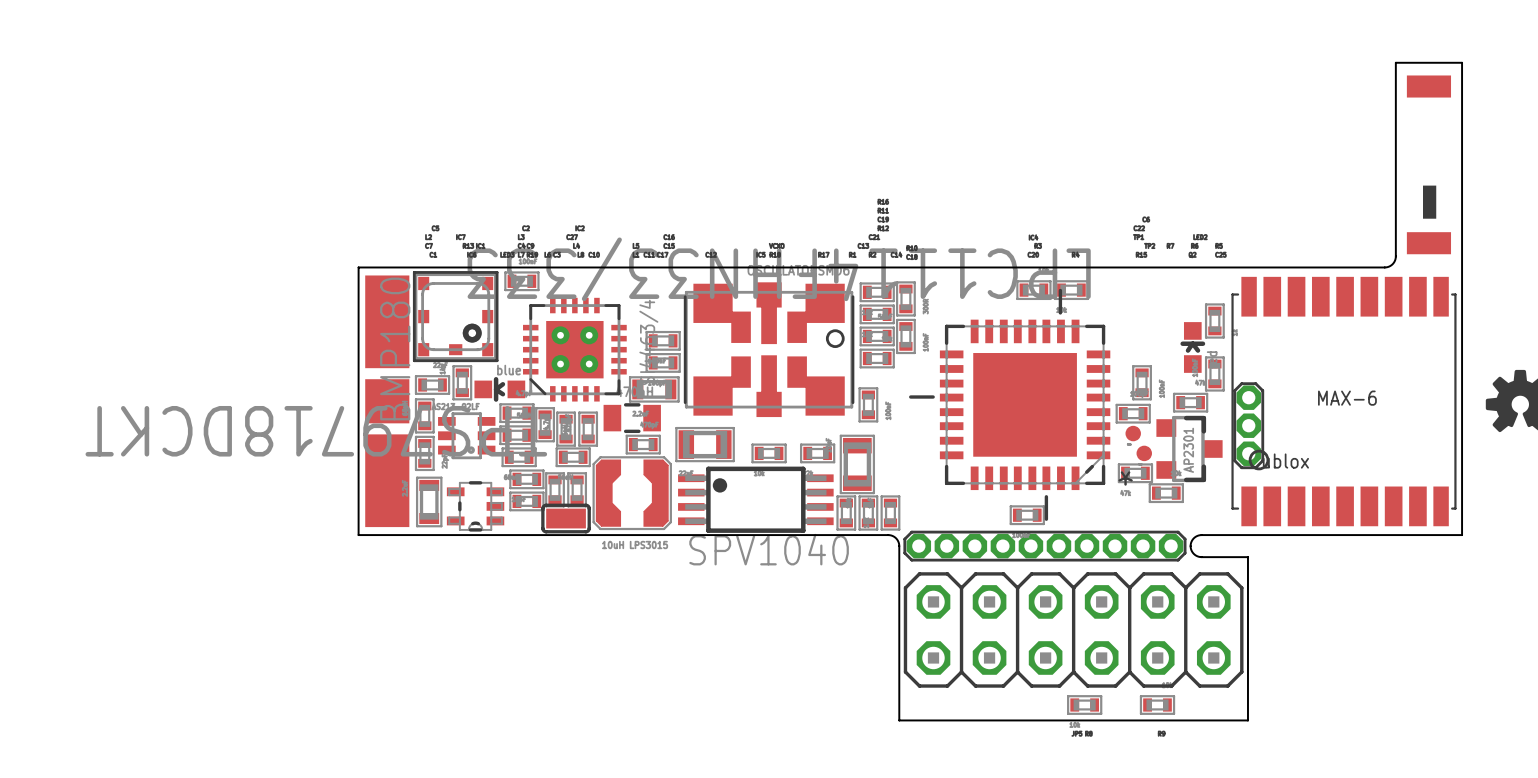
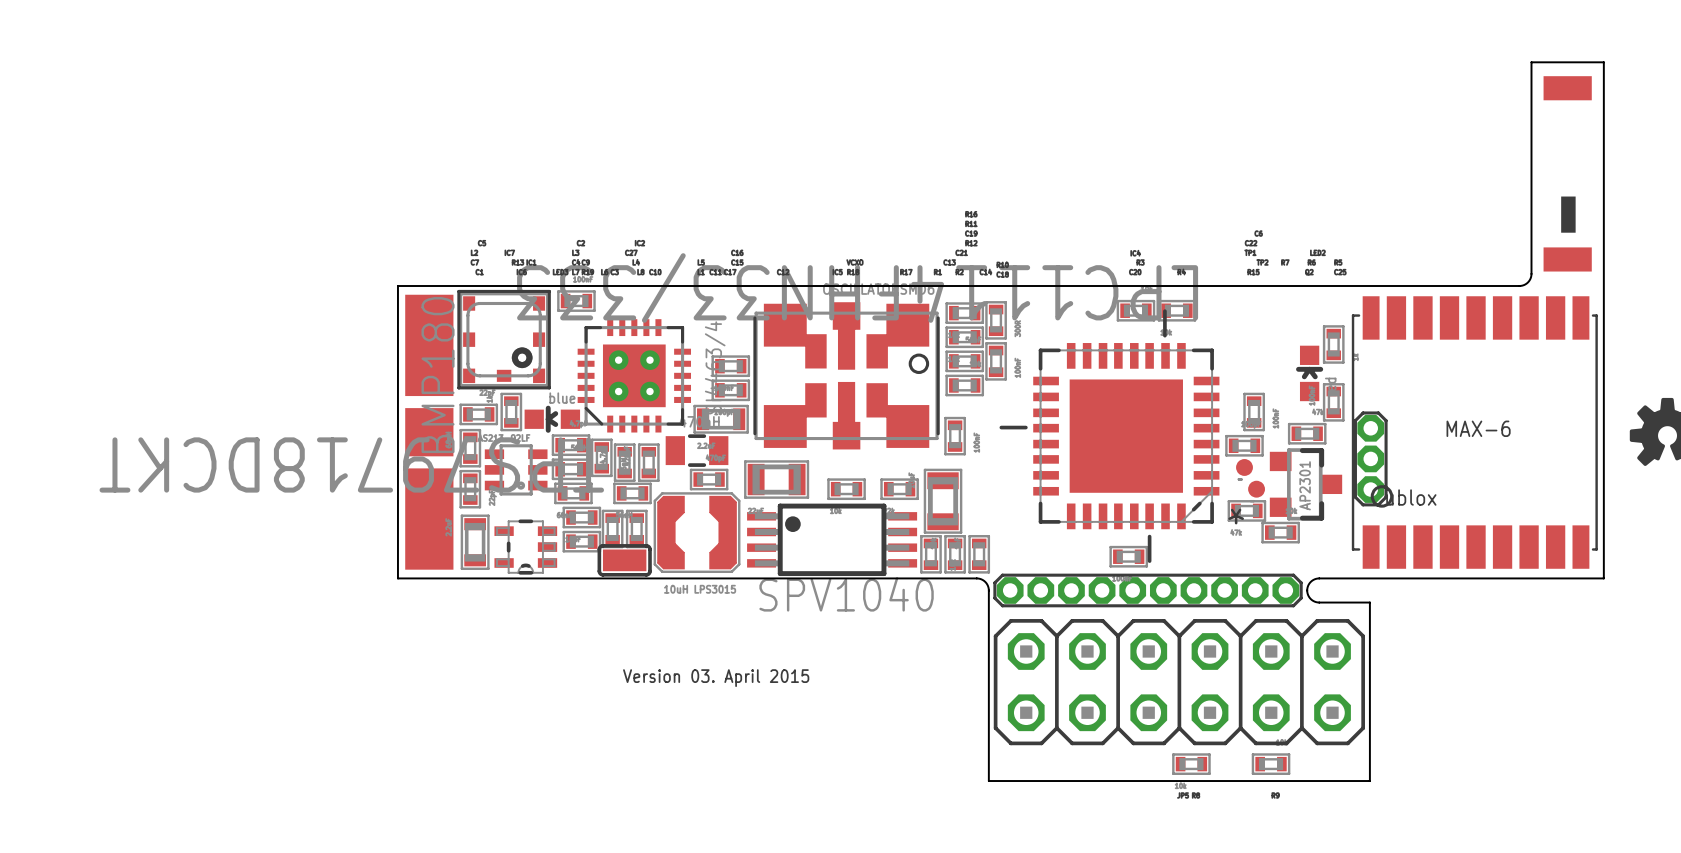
text: none -> Version 03. April 2015 (716, 678)

